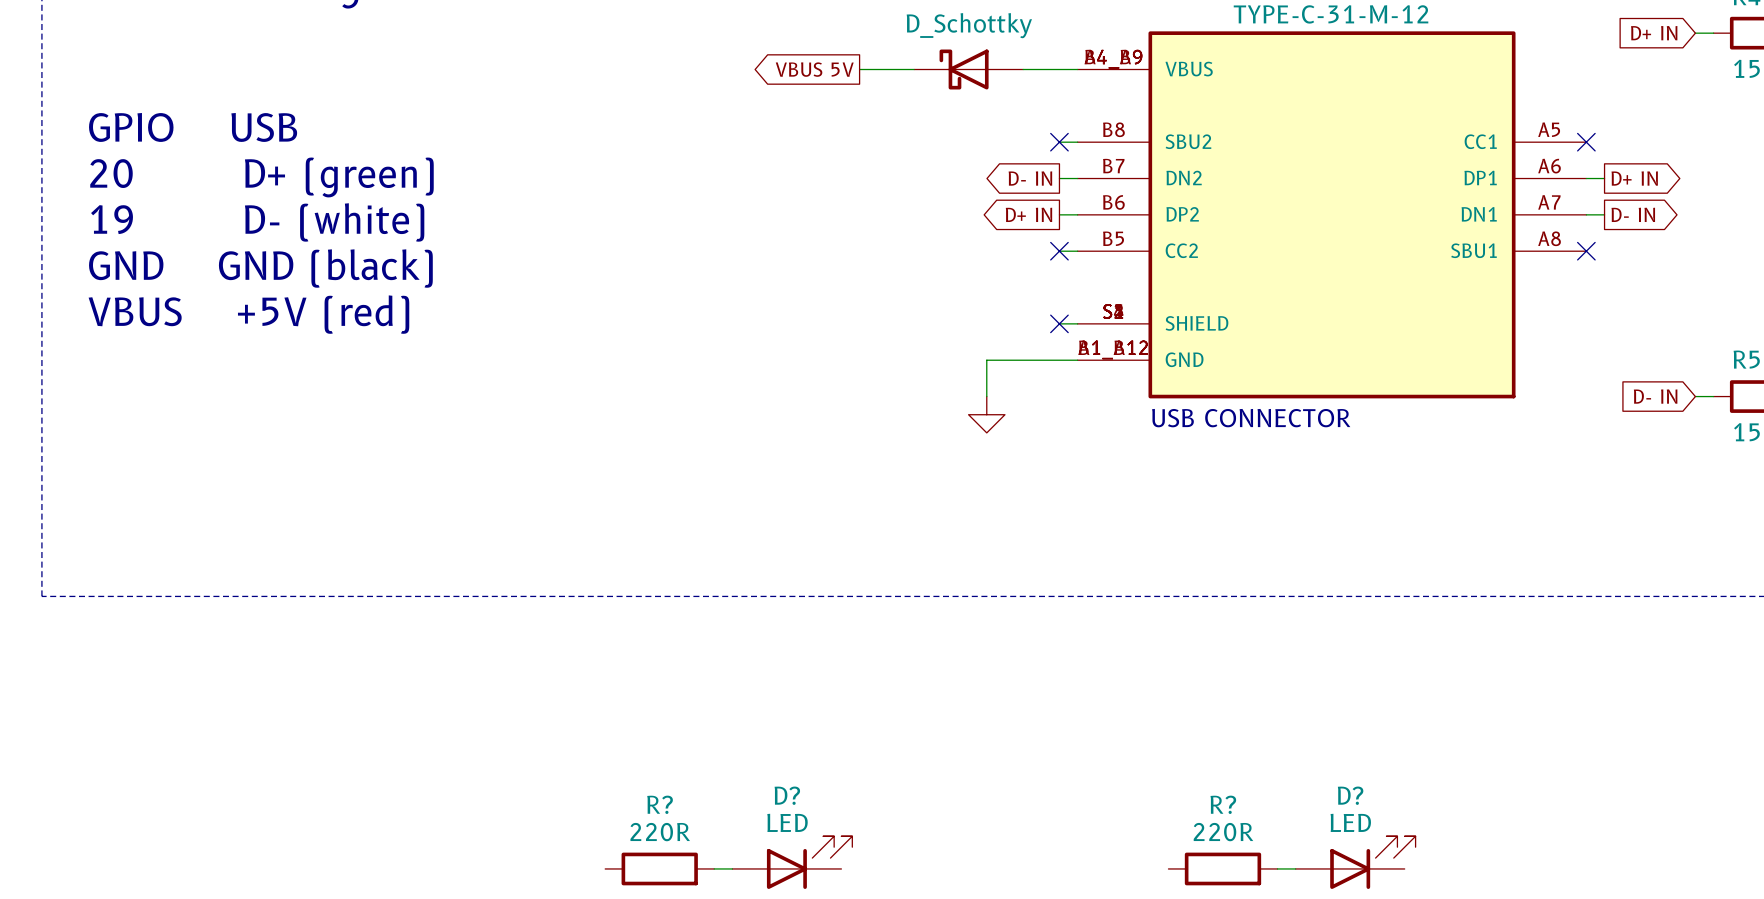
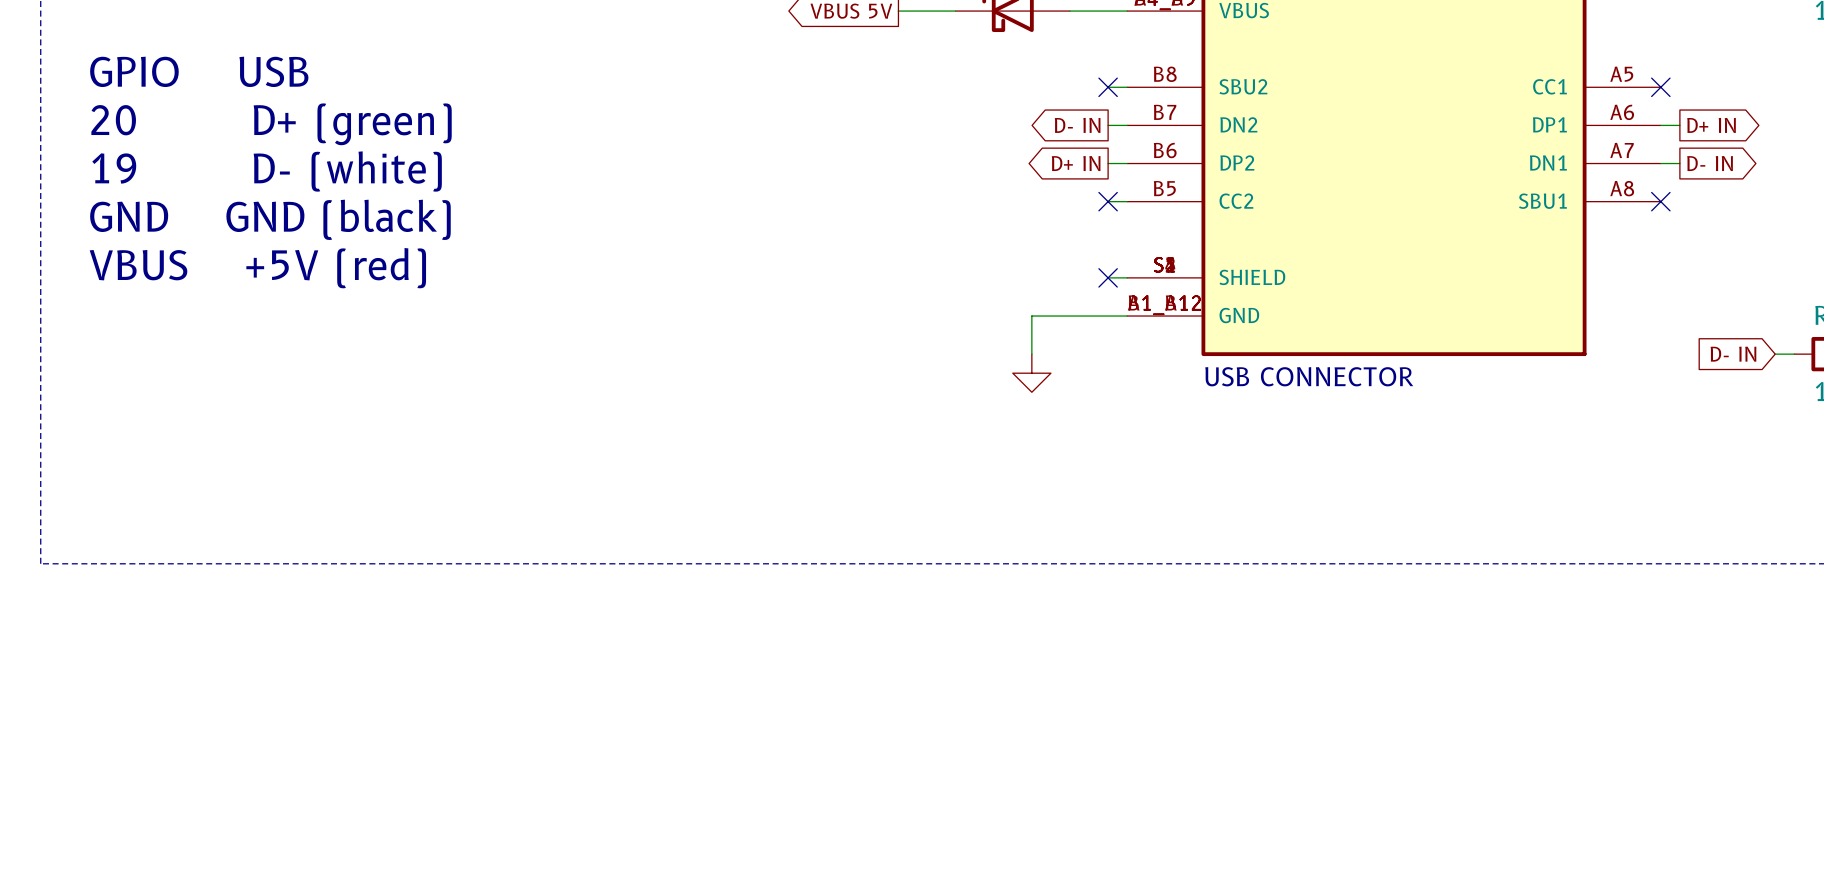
D?: LED (792, 862) -> none
D?: LED (1355, 862) -> none
R?: 220R (659, 868) -> none
wire: (714, 868) (732, 868) -> none
R?: 220R (1222, 868) -> none
wire: (1277, 868) (1295, 868) -> none

